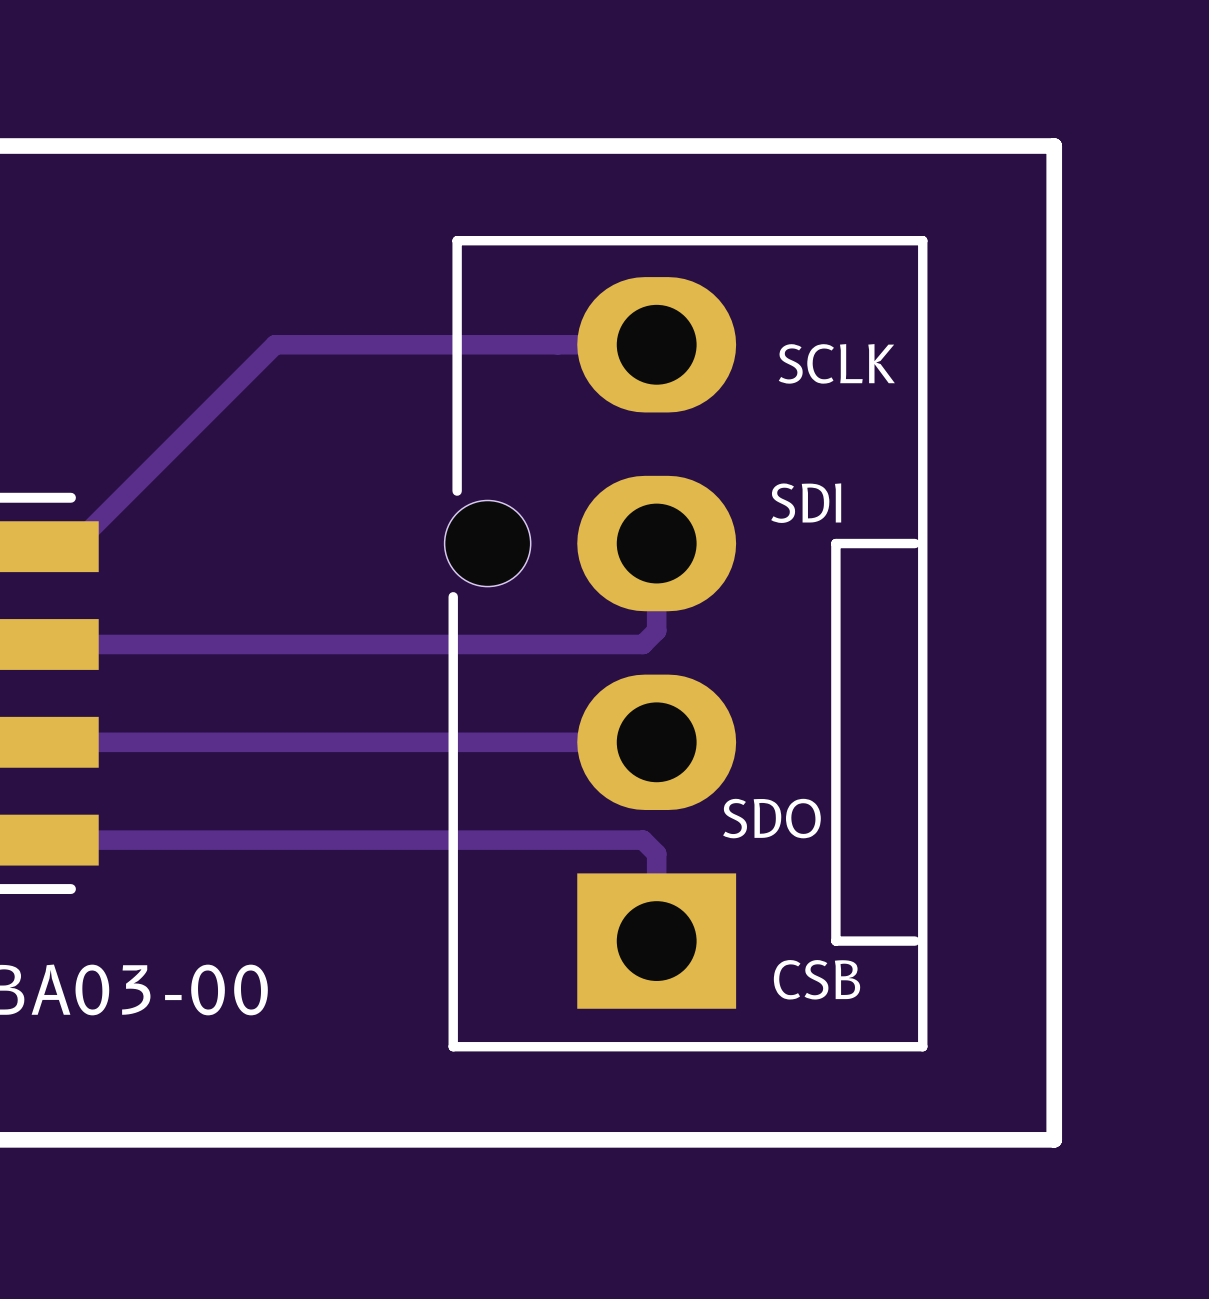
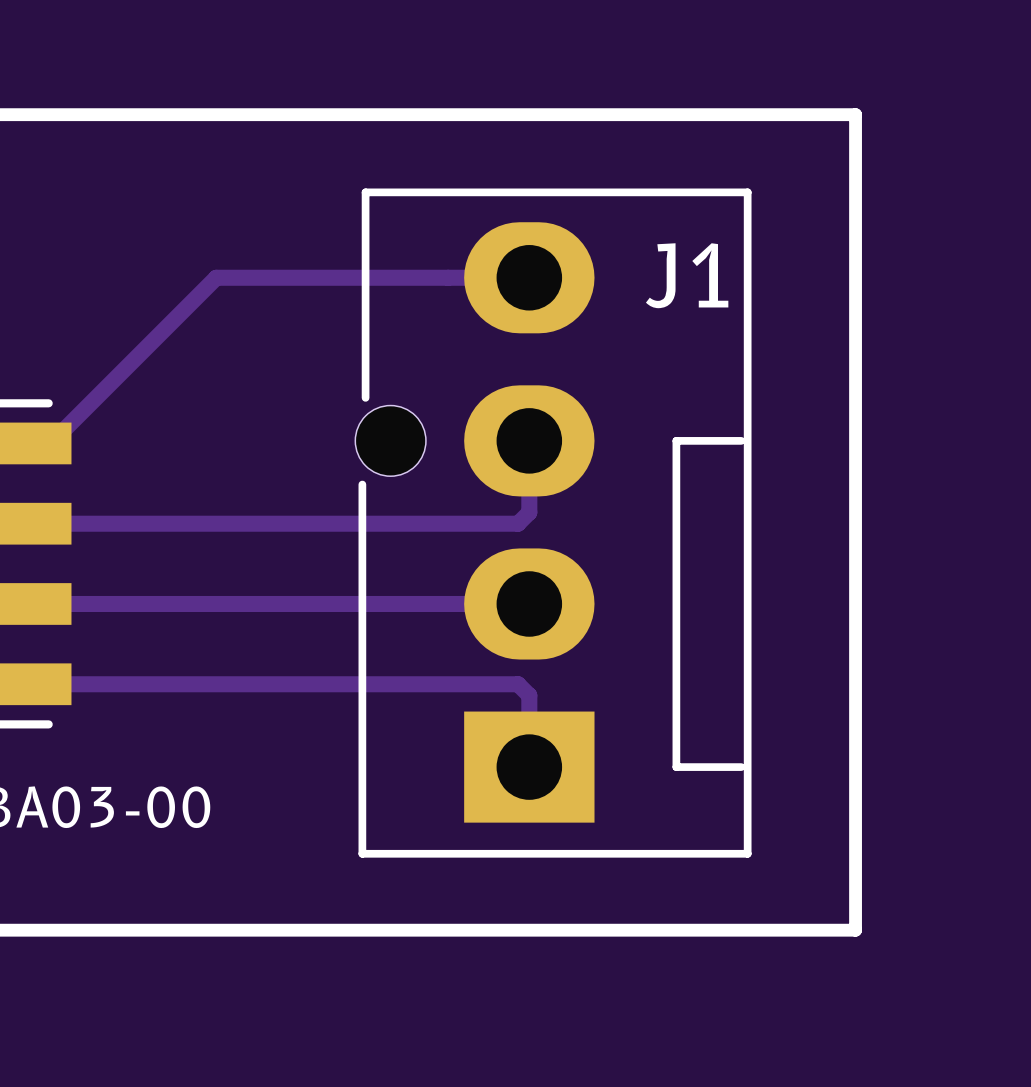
J1 name: none -> J1 (687, 275)
text: SCLK (836, 363) -> none
text: SDI (806, 503) -> none
text: SDO (771, 818) -> none
text: CSB (817, 979) -> none

